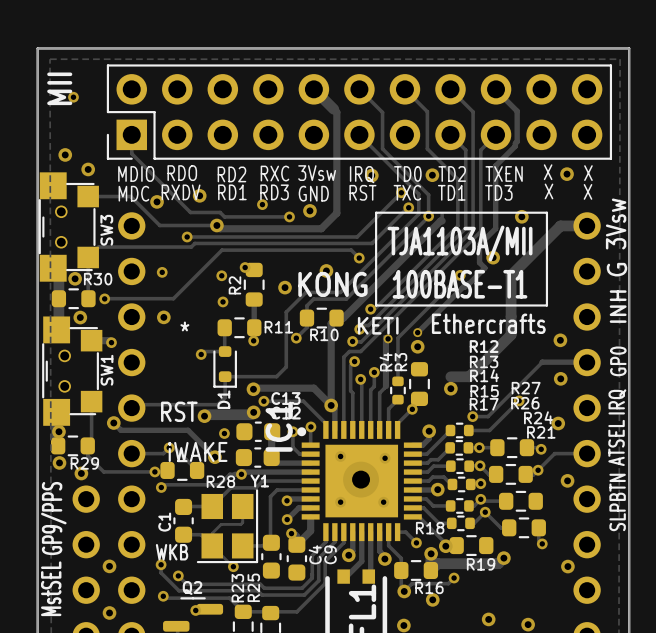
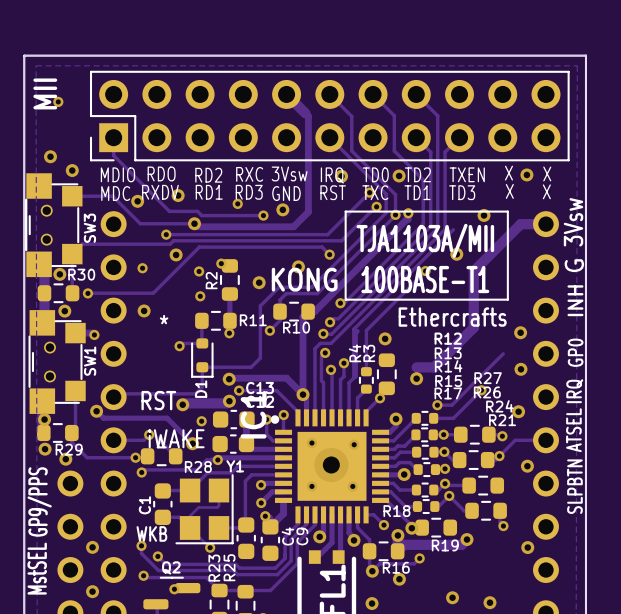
track: (495, 89) (517, 111) (517, 141) (515, 146) (495, 165) (495, 228) (479, 244) (479, 262) (484, 268) (417, 332) -> none
via: none -> (408, 213)
track: none -> (453, 229) (353, 329)
via: none -> (176, 254)
text: KETI (378, 325) -> none
via: (417, 332) -> none
via: (388, 338) -> none
track: (587, 362) (542, 362) -> none

